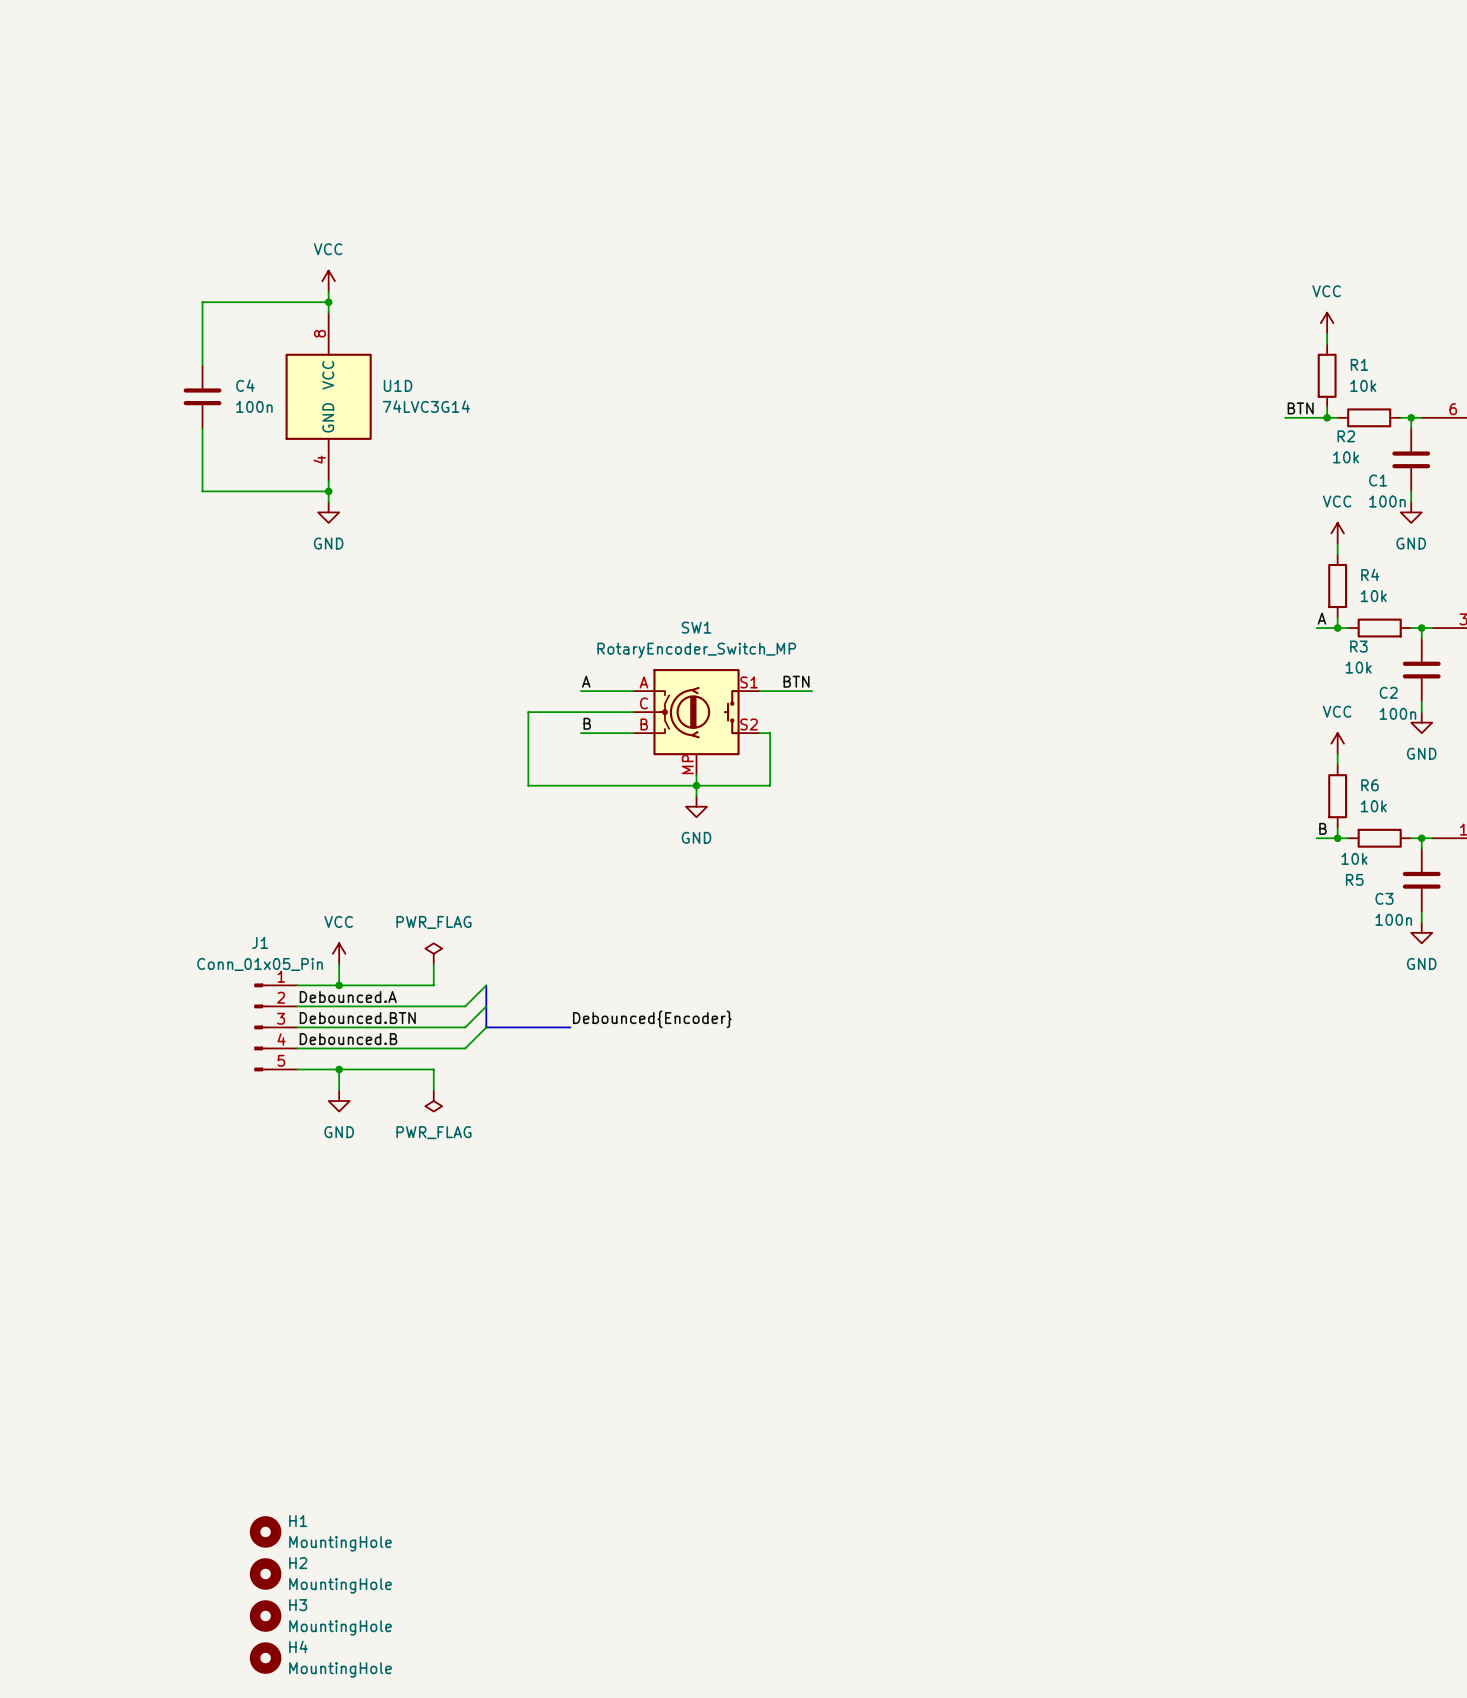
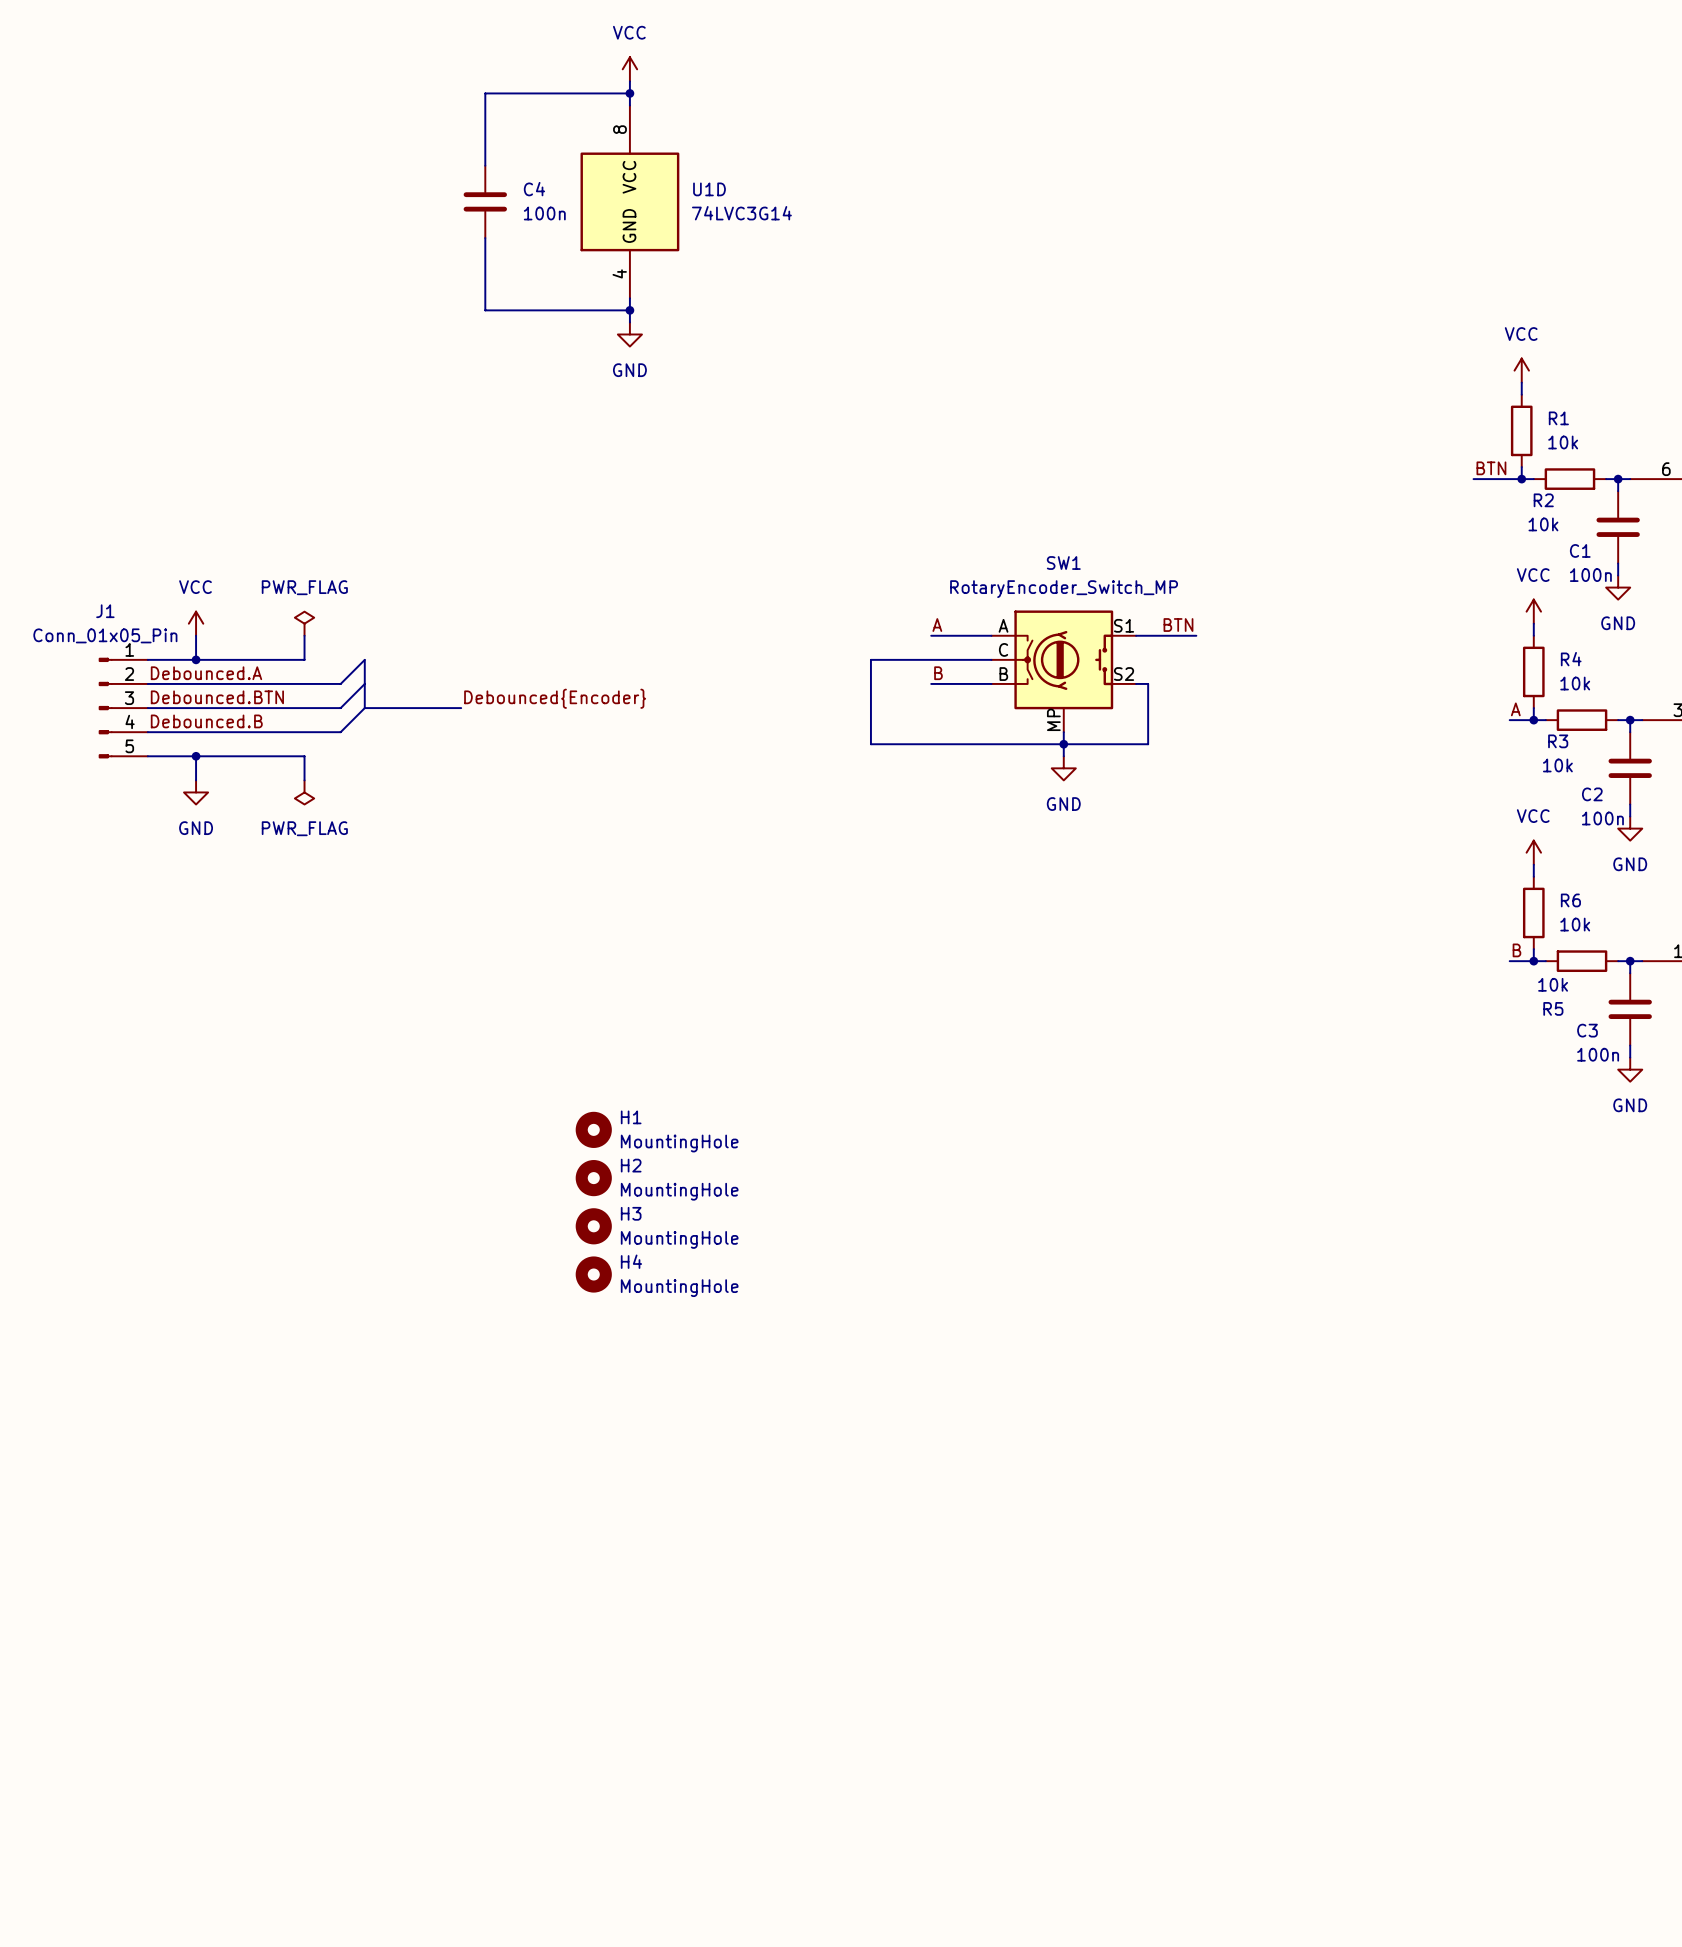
power symbol: none -> VCC (629, 69)
wire: none -> (629, 81) (629, 105)
wire: none -> (629, 93) (485, 93) (485, 165)
junction: none -> (629, 93)
wire: none -> (485, 238) (485, 310) (629, 310)
wire: none -> (629, 298) (629, 322)
junction: none -> (629, 310)
power symbol: VCC (328, 281) -> none
wire: (328, 291) (328, 312) -> none
power symbol: none -> GND (629, 334)
wire: (328, 302) (202, 302) (202, 365) -> none
junction: (328, 302) -> none
C4 position: (202, 396) -> (485, 201)
U1D position: (328, 396) -> (629, 201)
wire: (202, 428) (202, 491) (328, 491) -> none
wire: (328, 480) (328, 501) -> (196, 635) (196, 659)
junction: (328, 491) -> none
power symbol: GND (328, 512) -> none
power symbol: none -> VCC (196, 623)
power symbol: none -> PWR_FLAG (304, 623)
label: none -> A (937, 625)
label: none -> BTN (1178, 625)
wire: none -> (304, 635) (304, 659) (147, 659)
wire: none -> (931, 635) (991, 635)
wire: none -> (1136, 635) (1196, 635)
junction: none -> (196, 659)
wire: none -> (364, 659) (340, 683) (147, 683)
bus: none -> (364, 659) (364, 708) (461, 708)
wire: none -> (991, 659) (870, 659) (870, 744) (1148, 744) (1148, 683) (1136, 683)
label: none -> Debounced.A (206, 673)
label: none -> B (938, 673)
wire: none -> (364, 683) (340, 708) (147, 708)
label: none -> Debounced.BTN (217, 697)
label: none -> Debounced{Encoder} (555, 698)
wire: none -> (364, 708) (340, 732) (147, 732)
label: none -> Debounced.B (206, 721)
wire: none -> (1063, 732) (1063, 756)
junction: none -> (1063, 744)
wire: none -> (147, 756) (304, 756) (304, 780)
wire: none -> (196, 756) (196, 780)
junction: none -> (196, 756)
power symbol: none -> GND (1063, 768)
label: A (586, 681) -> none
label: BTN (796, 681) -> none
power symbol: none -> GND (196, 792)
power symbol: none -> PWR_FLAG (304, 792)
wire: (580, 691) (633, 691) -> none
wire: (759, 691) (812, 691) -> (931, 683) (991, 683)
wire: (633, 712) (528, 712) (528, 785) (770, 785) (770, 733) (759, 733) -> none
SW1 position: (696, 722) -> (1063, 671)
label: B (587, 723) -> none
wire: (580, 733) (633, 733) -> none
wire: (696, 775) (696, 796) -> none
junction: (696, 785) -> none
power symbol: GND (696, 806) -> none
power symbol: VCC (339, 953) -> none
power symbol: PWR_FLAG (433, 953) -> none
wire: (339, 964) (339, 985) -> none
wire: (433, 964) (433, 985) (297, 985) -> none
junction: (339, 985) -> none
wire: (486, 985) (465, 1006) (297, 1006) -> none
bus: (486, 985) (486, 1027) (570, 1027) -> none
label: Debounced.A (348, 997) -> none
wire: (486, 1006) (465, 1027) (297, 1027) -> none
label: Debounced.BTN (357, 1018) -> none
label: Debounced{Encoder} (652, 1019) -> none
J1 position: (275, 1027) -> (123, 708)
wire: (486, 1027) (465, 1048) (297, 1048) -> none
label: Debounced.B (348, 1039) -> none
wire: (297, 1069) (433, 1069) (433, 1090) -> none
wire: (339, 1069) (339, 1090) -> none
junction: (339, 1069) -> none
power symbol: GND (339, 1101) -> none
power symbol: PWR_FLAG (433, 1101) -> none
H1 position: (265, 1531) -> (593, 1129)
H2 position: (265, 1573) -> (593, 1178)
H3 position: (265, 1616) -> (593, 1226)
H4 position: (265, 1658) -> (593, 1274)

